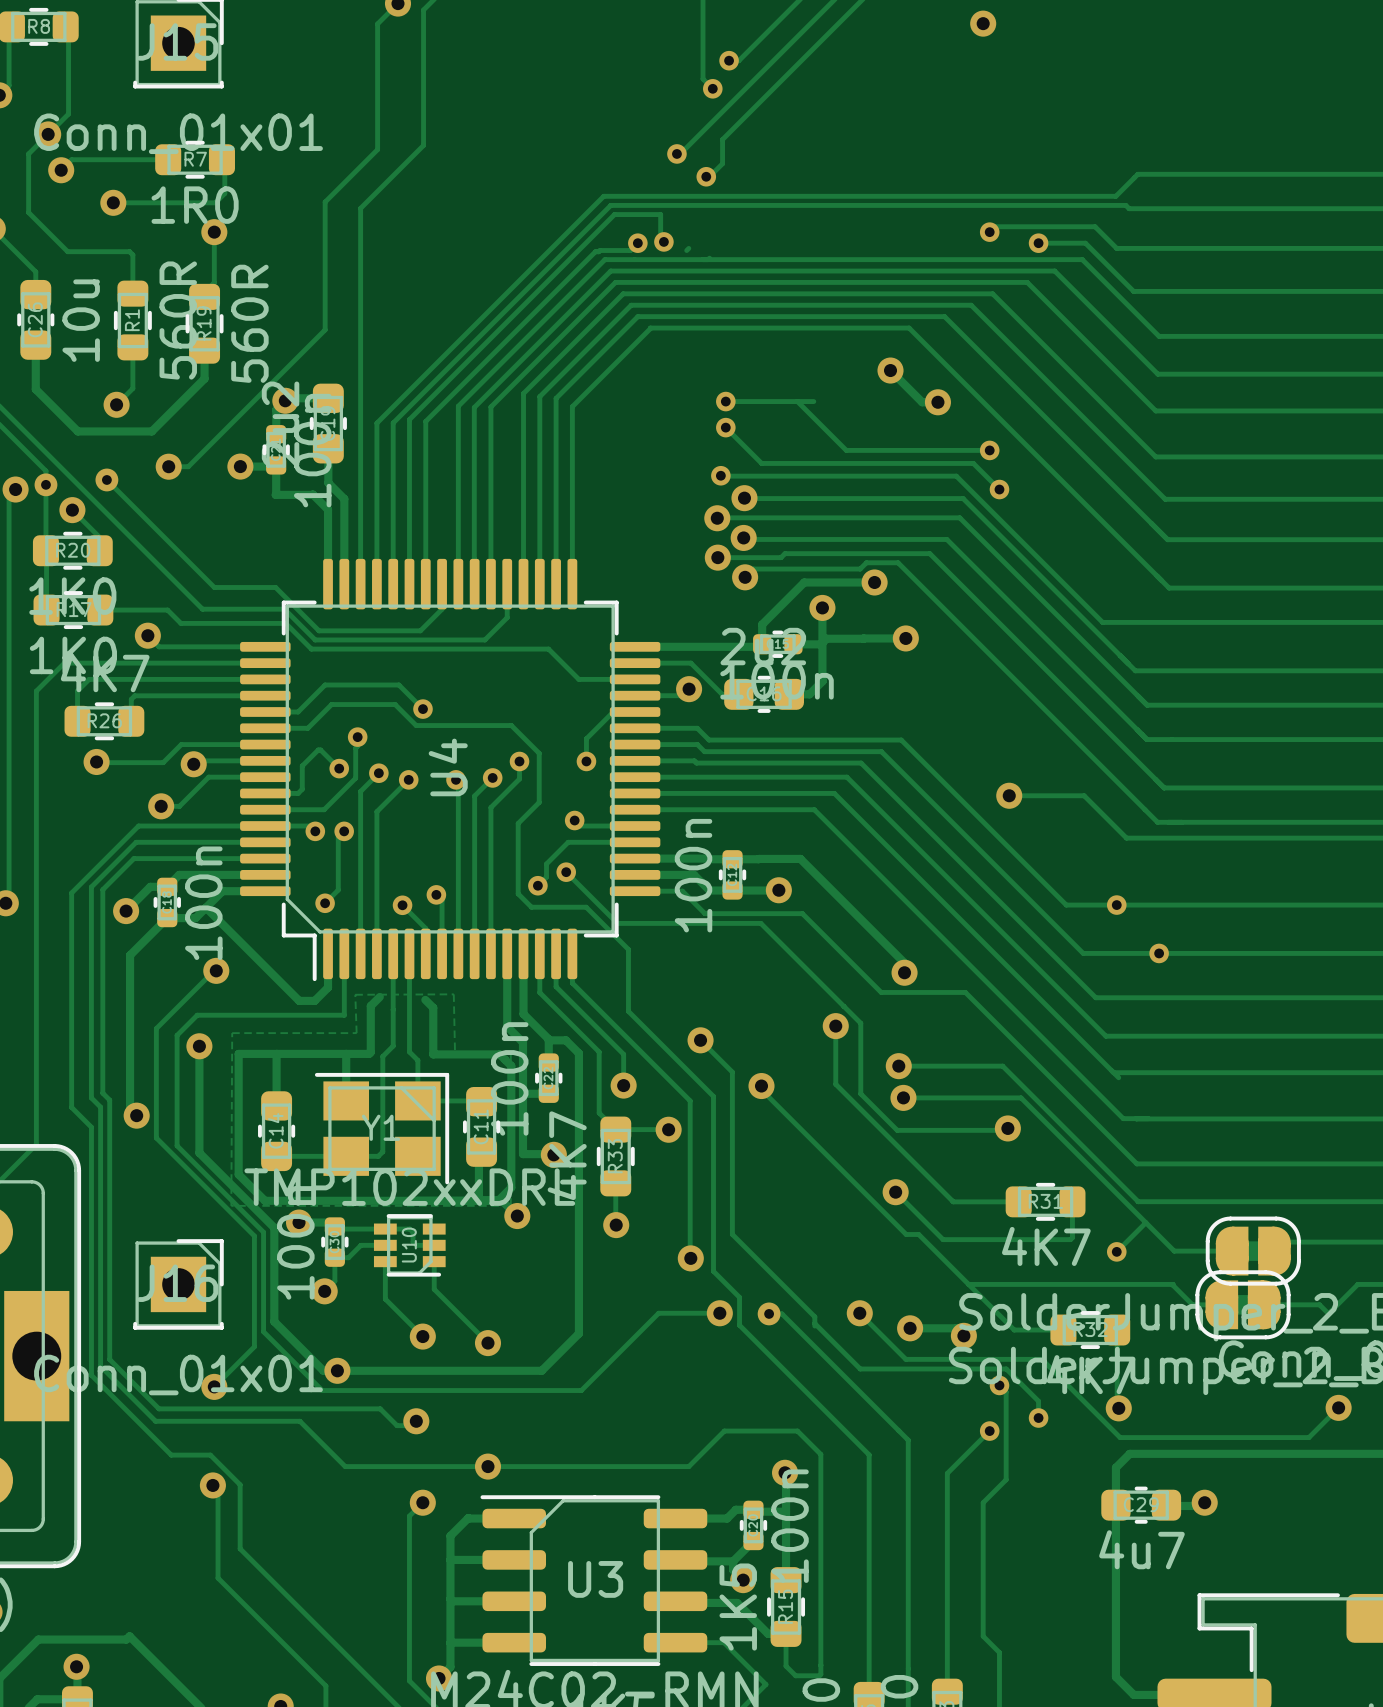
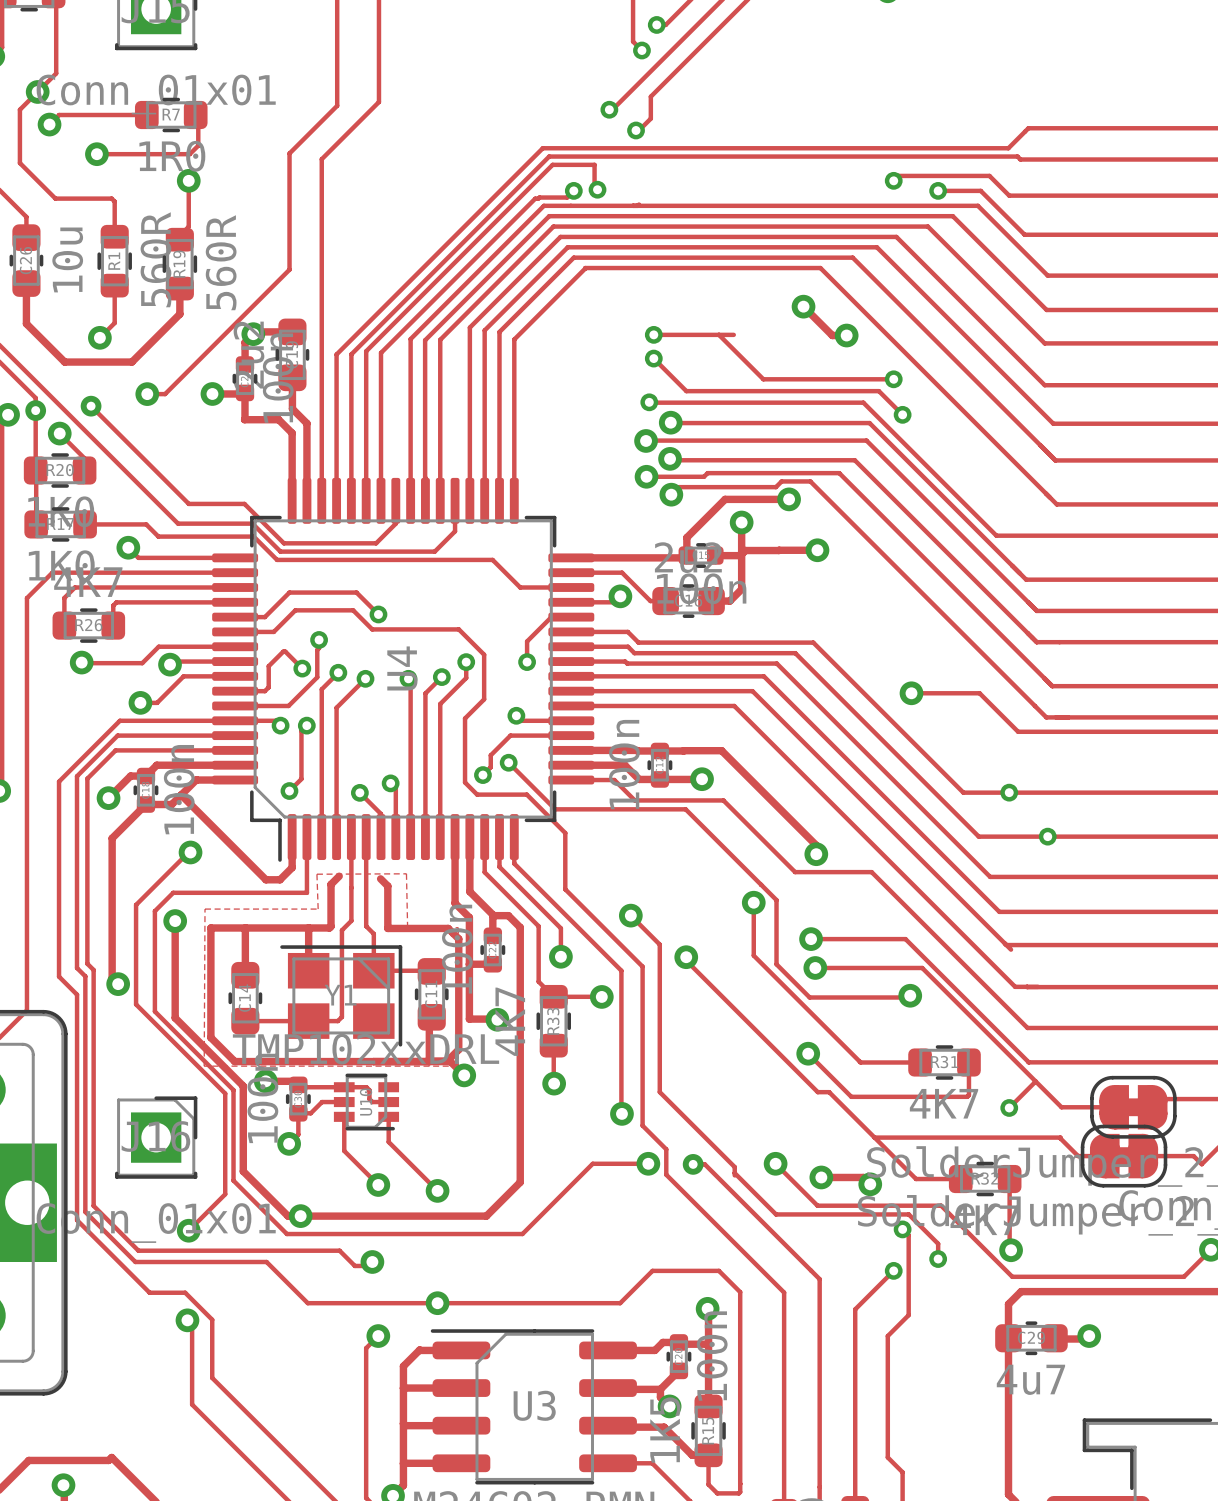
track: (688, 248) (686, 250) -> none

